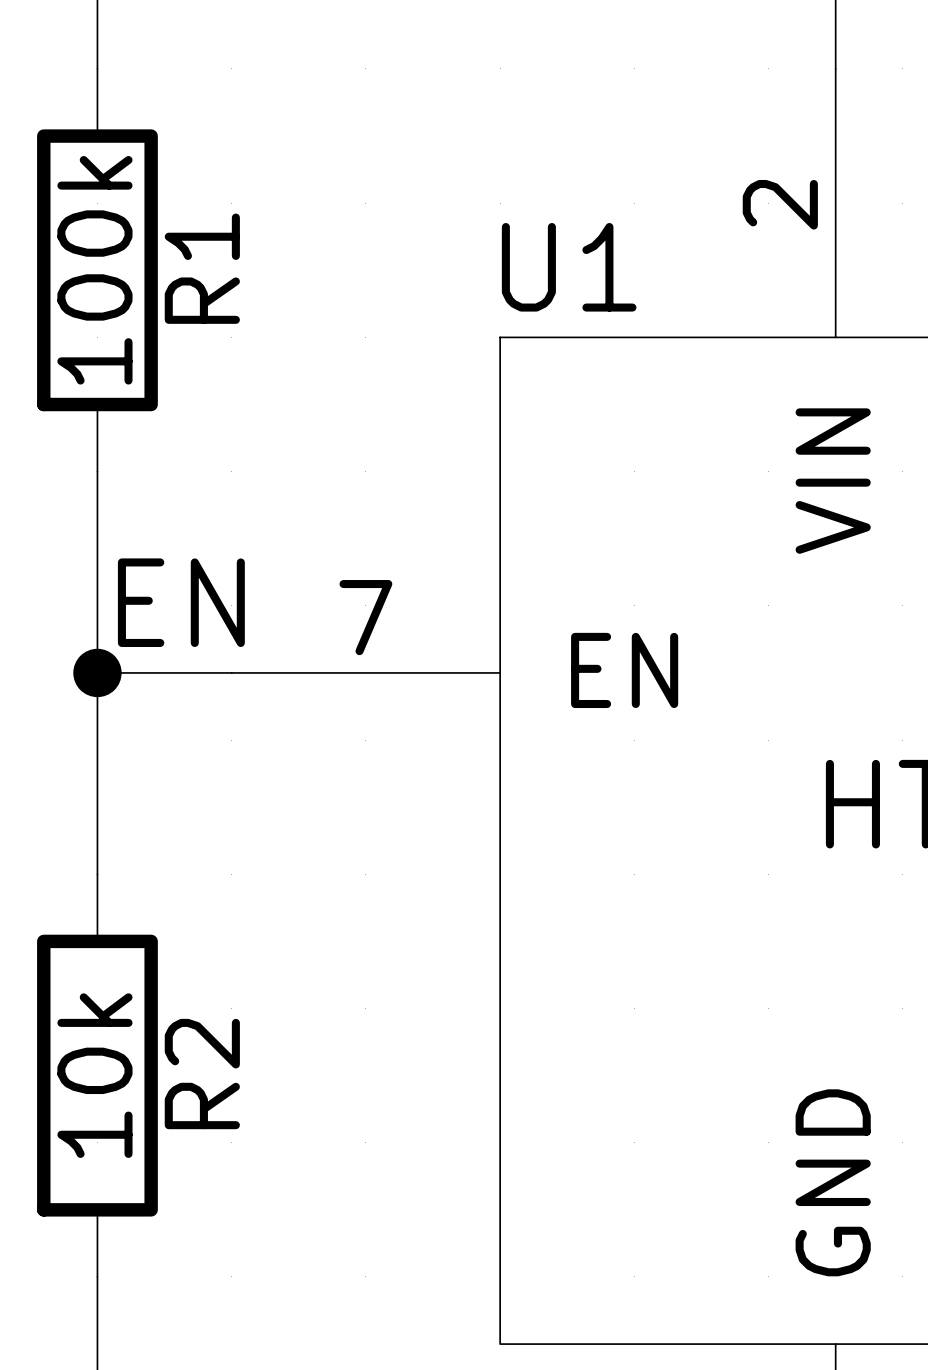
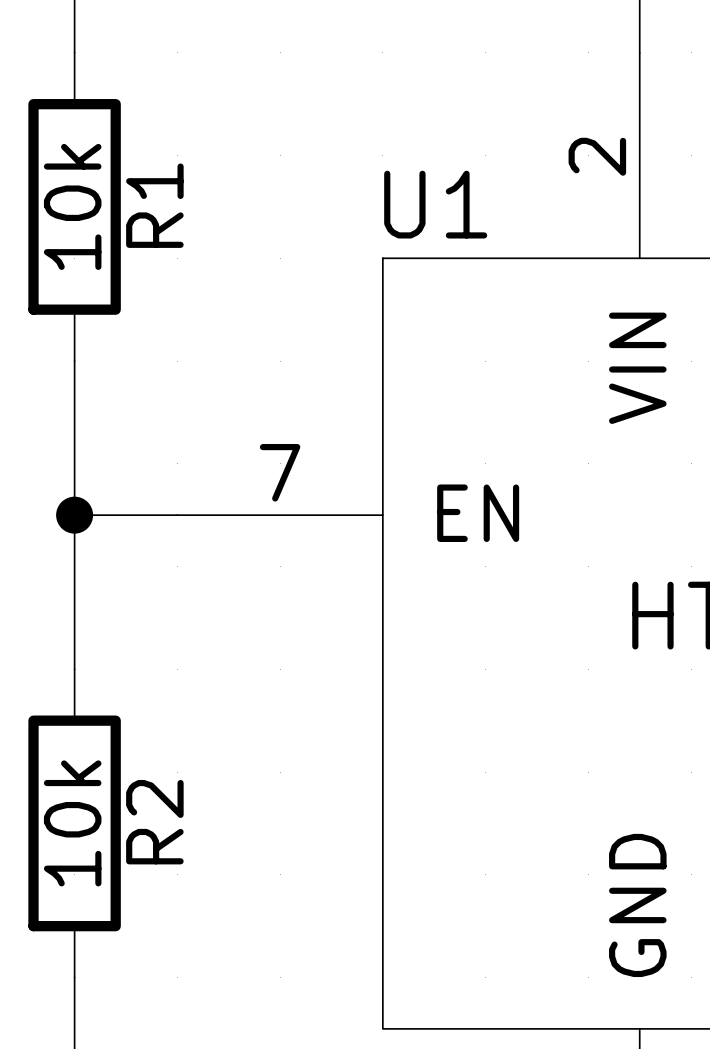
R1 value: 100k (94, 270) -> 10k (72, 206)
label: EN (181, 602) -> none

